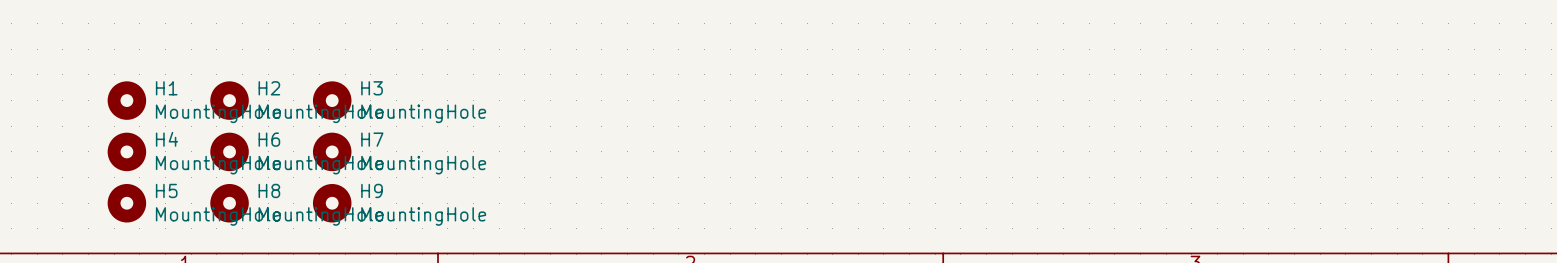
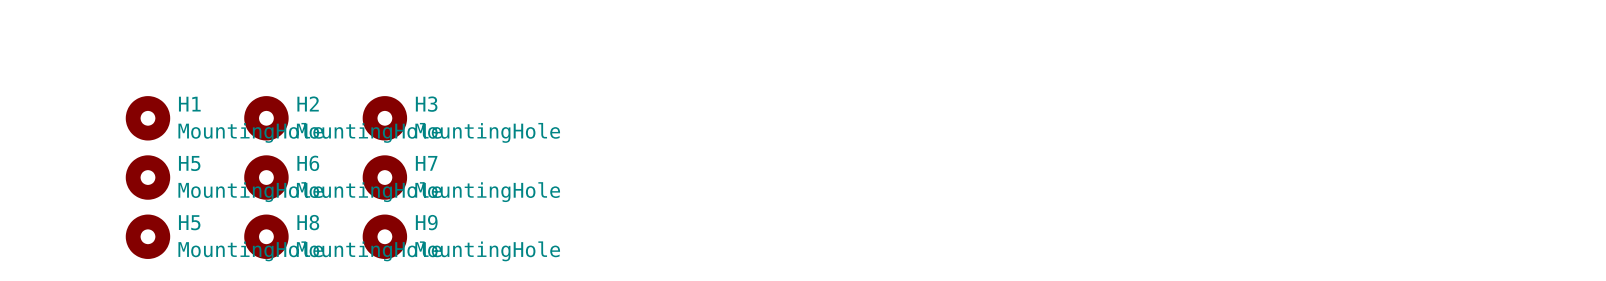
H4 name: H4 (167, 139) -> H5 (189, 163)

